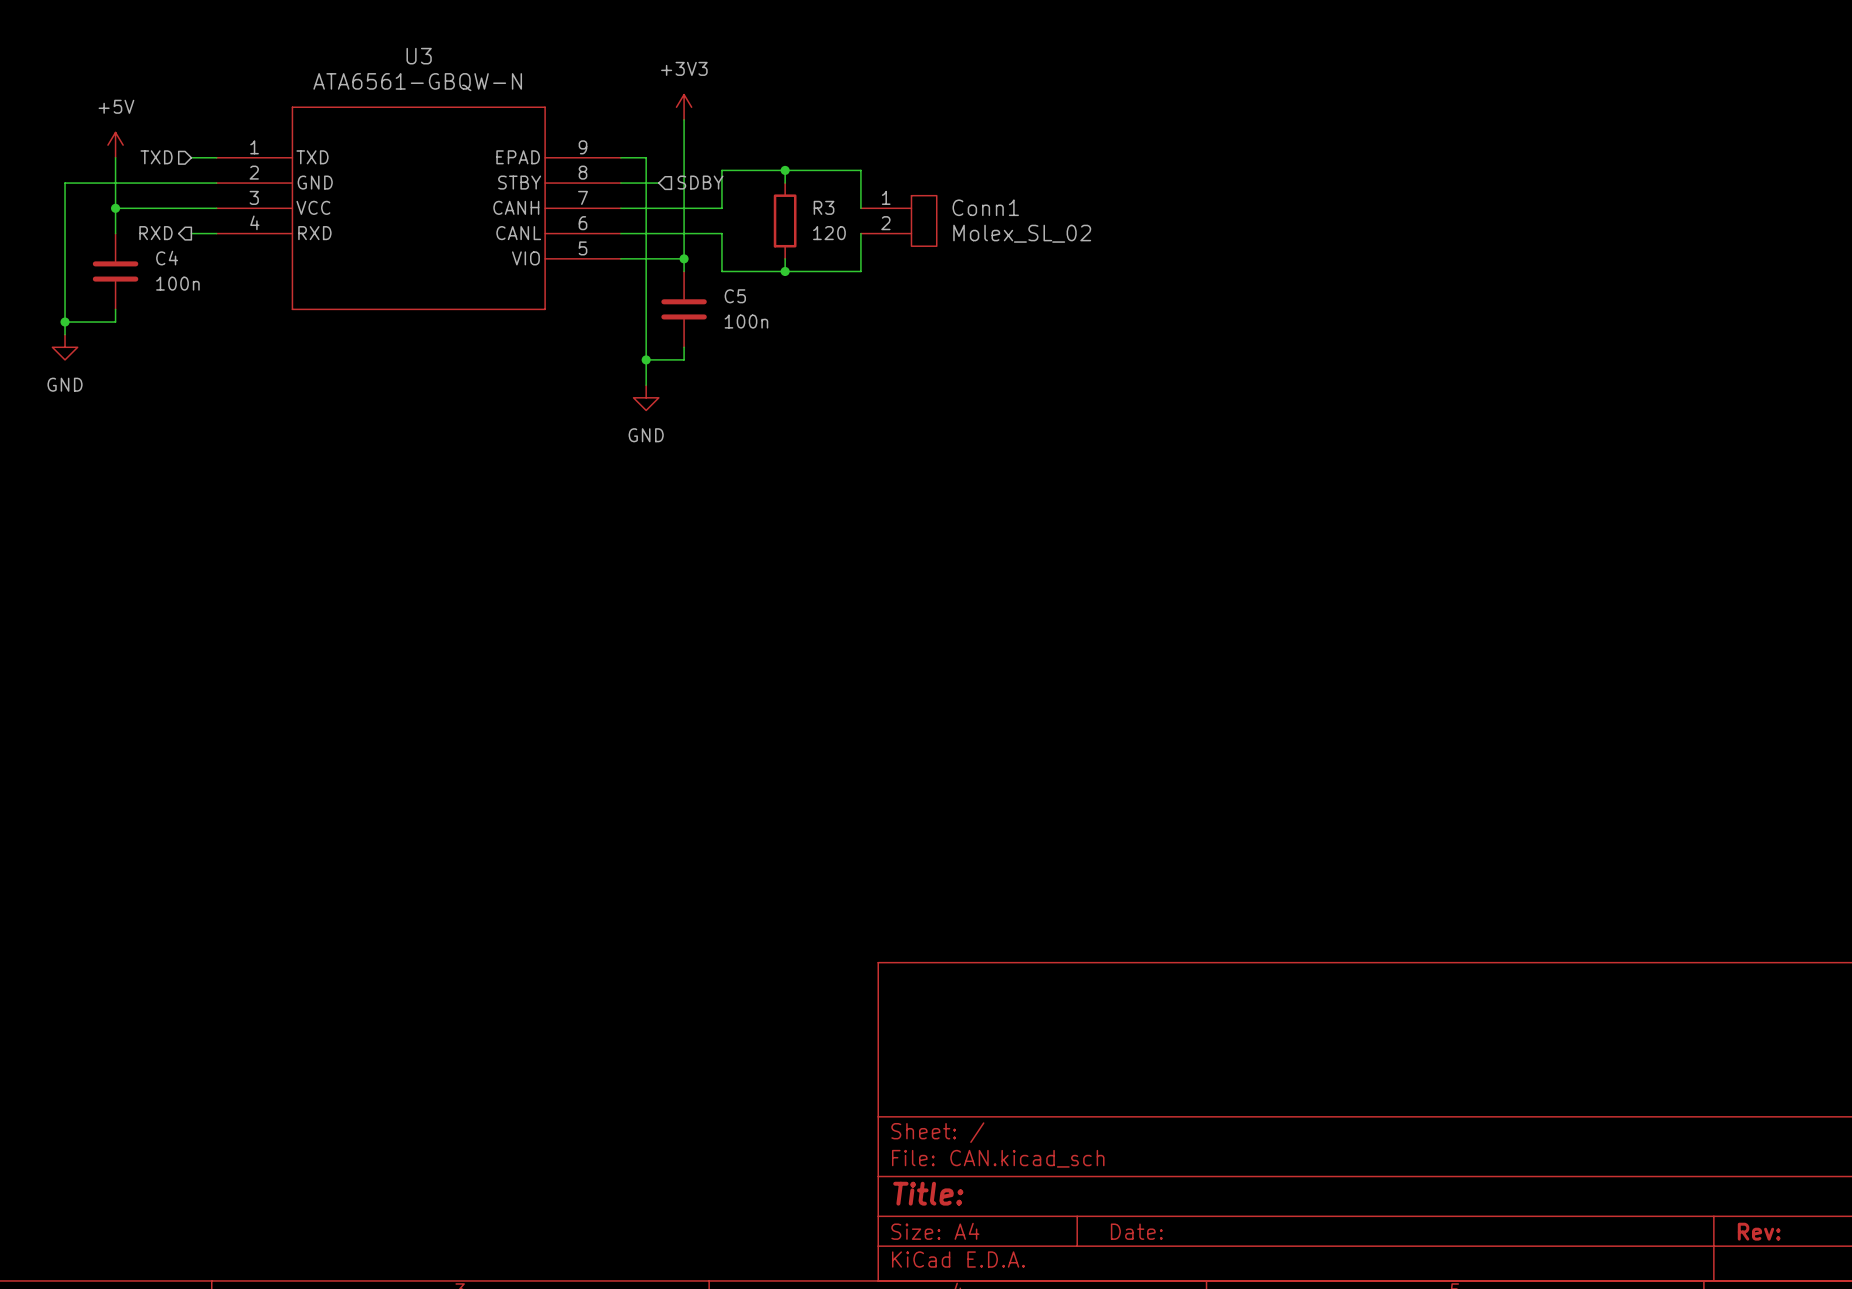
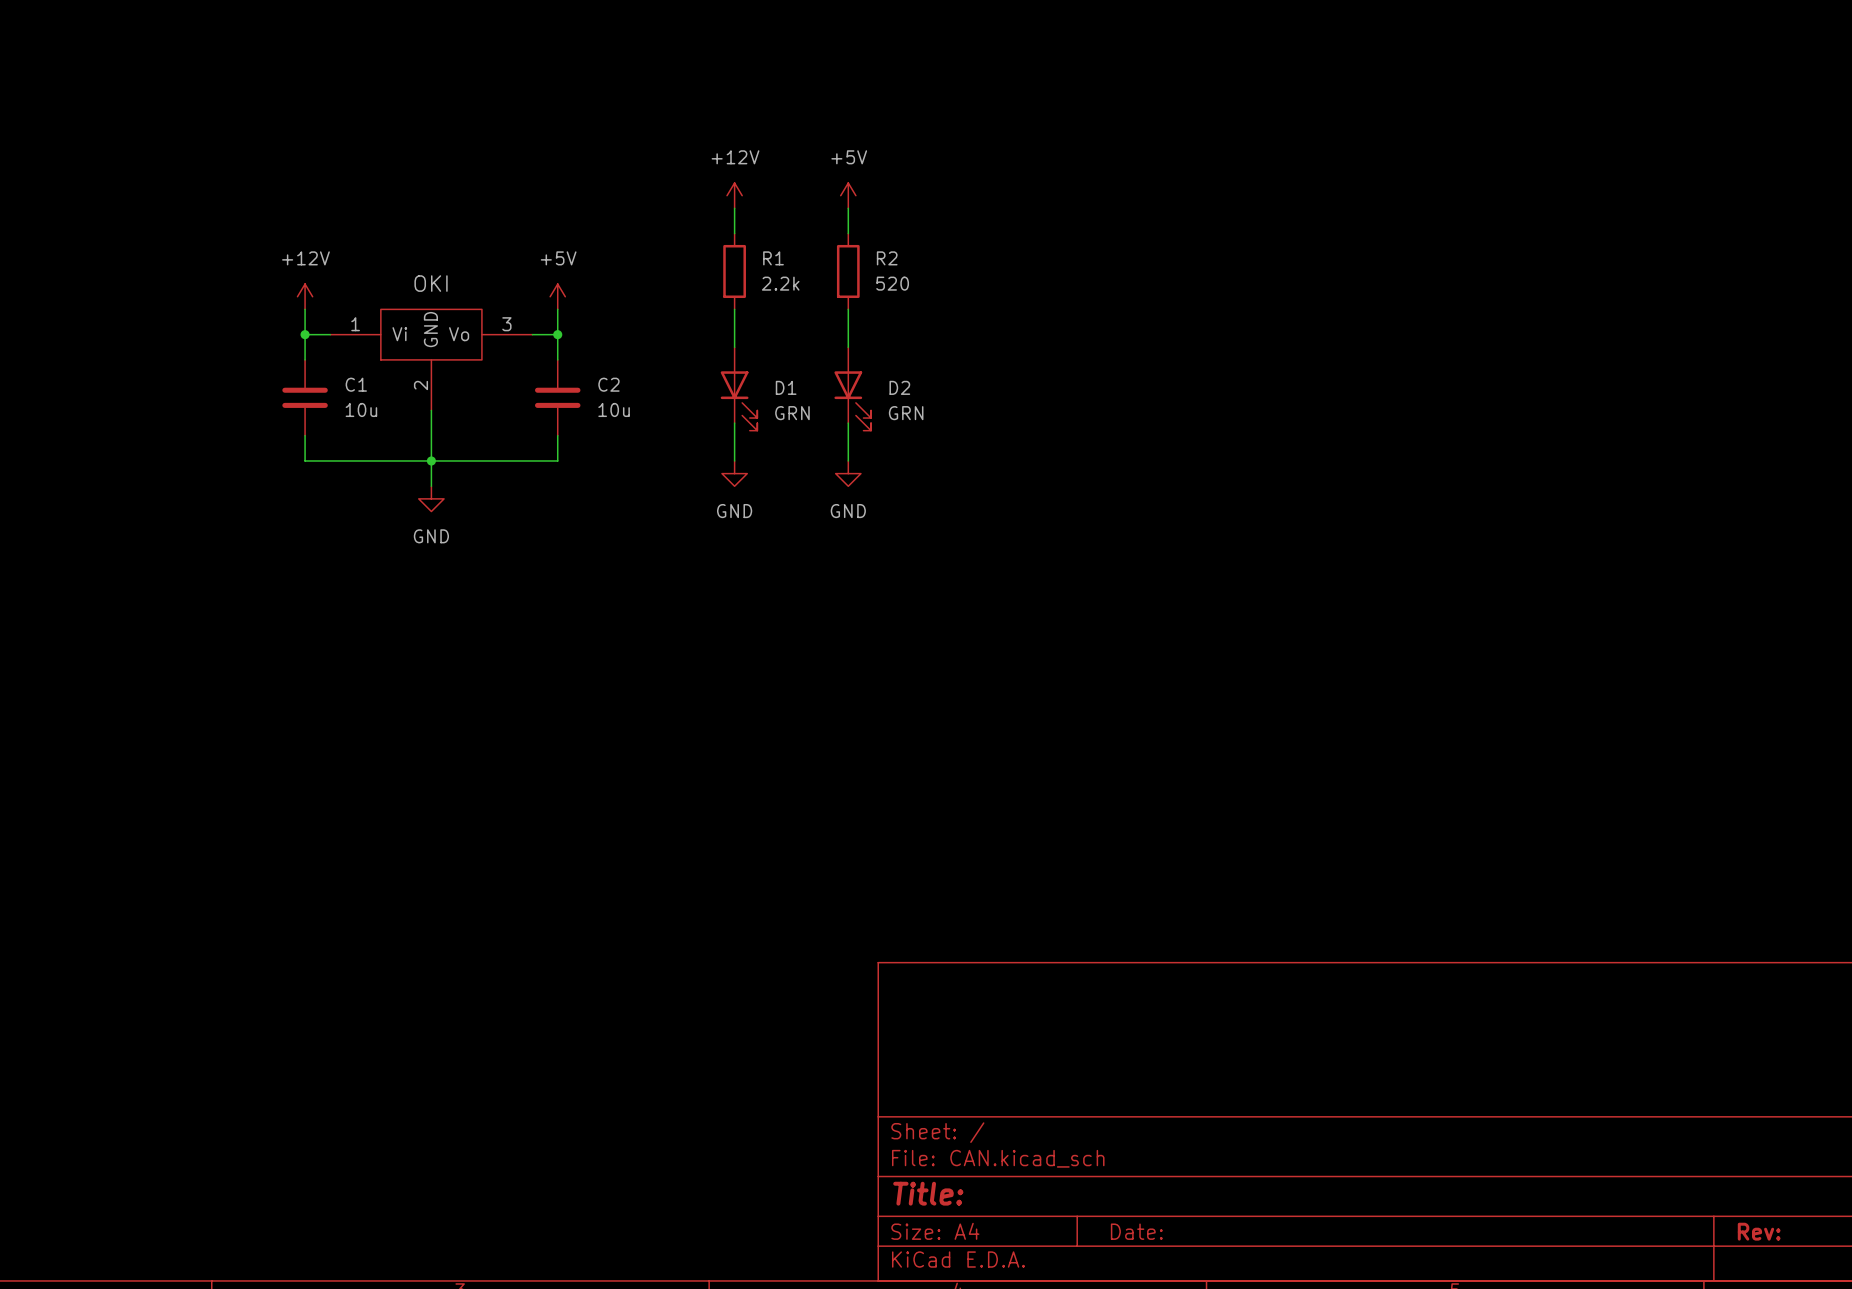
power symbol: +3V3 (684, 107) -> none
wire: (684, 119) (684, 271) -> none
power symbol: +5V (115, 145) -> none
wire: (115, 157) (115, 233) -> none
hierarchical label: TXD (156, 157) -> none
wire: (191, 157) (216, 157) -> none
wire: (620, 157) (646, 157) (646, 385) -> none
wire: (785, 170) (785, 183) -> none
junction: (785, 170) -> none
hierarchical label: SDBY (700, 182) -> none
wire: (216, 183) (65, 183) (65, 334) -> none
wire: (620, 183) (658, 183) -> none
power symbol: none -> +12V (734, 195)
power symbol: none -> +5V (848, 195)
wire: (115, 208) (216, 208) -> none
junction: (115, 208) -> none
U3: ATA6561-GBQW-N (418, 208) -> none
wire: (620, 208) (721, 208) (721, 170) (860, 170) (860, 208) -> none
wire: none -> (734, 208) (734, 233)
wire: none -> (848, 208) (848, 233)
R3: 120 (785, 220) -> none
Conn1: Molex_SL_02 (898, 220) -> none
hierarchical label: RXD (155, 233) -> none
wire: (191, 233) (216, 233) -> (305, 334) (330, 334)
wire: (620, 233) (721, 233) (721, 271) (860, 271) (860, 233) -> none
wire: (620, 258) (684, 258) -> none
junction: (684, 258) -> none
wire: (785, 258) (785, 271) -> none
C4: 100n (115, 271) -> none
R1: none -> 2.2k (734, 271)
junction: (785, 271) -> none
R2: none -> 520 (848, 271)
power symbol: none -> +12V (305, 296)
power symbol: none -> +5V (557, 296)
wire: (115, 309) (115, 322) (65, 322) -> none
wire: none -> (305, 309) (305, 359)
wire: none -> (557, 309) (557, 359)
C5: 100n (684, 309) -> none
wire: none -> (734, 309) (734, 347)
wire: none -> (848, 309) (848, 347)
junction: (65, 322) -> none
junction: none -> (305, 334)
wire: none -> (532, 334) (557, 334)
junction: none -> (557, 334)
power symbol: GND (65, 347) -> none
wire: (684, 347) (684, 359) (646, 359) -> none
part: none -> OKI (431, 359)
junction: (646, 359) -> none
D1: none -> GRN (739, 388)
D2: none -> GRN (852, 388)
C1: none -> 10u (305, 397)
C2: none -> 10u (557, 397)
power symbol: GND (646, 397) -> none
wire: none -> (431, 410) (431, 486)
wire: none -> (734, 423) (734, 460)
wire: none -> (848, 423) (848, 460)
wire: none -> (305, 435) (305, 460) (557, 460) (557, 435)
junction: none -> (431, 460)
power symbol: none -> GND (734, 473)
power symbol: none -> GND (848, 473)
power symbol: none -> GND (431, 498)

